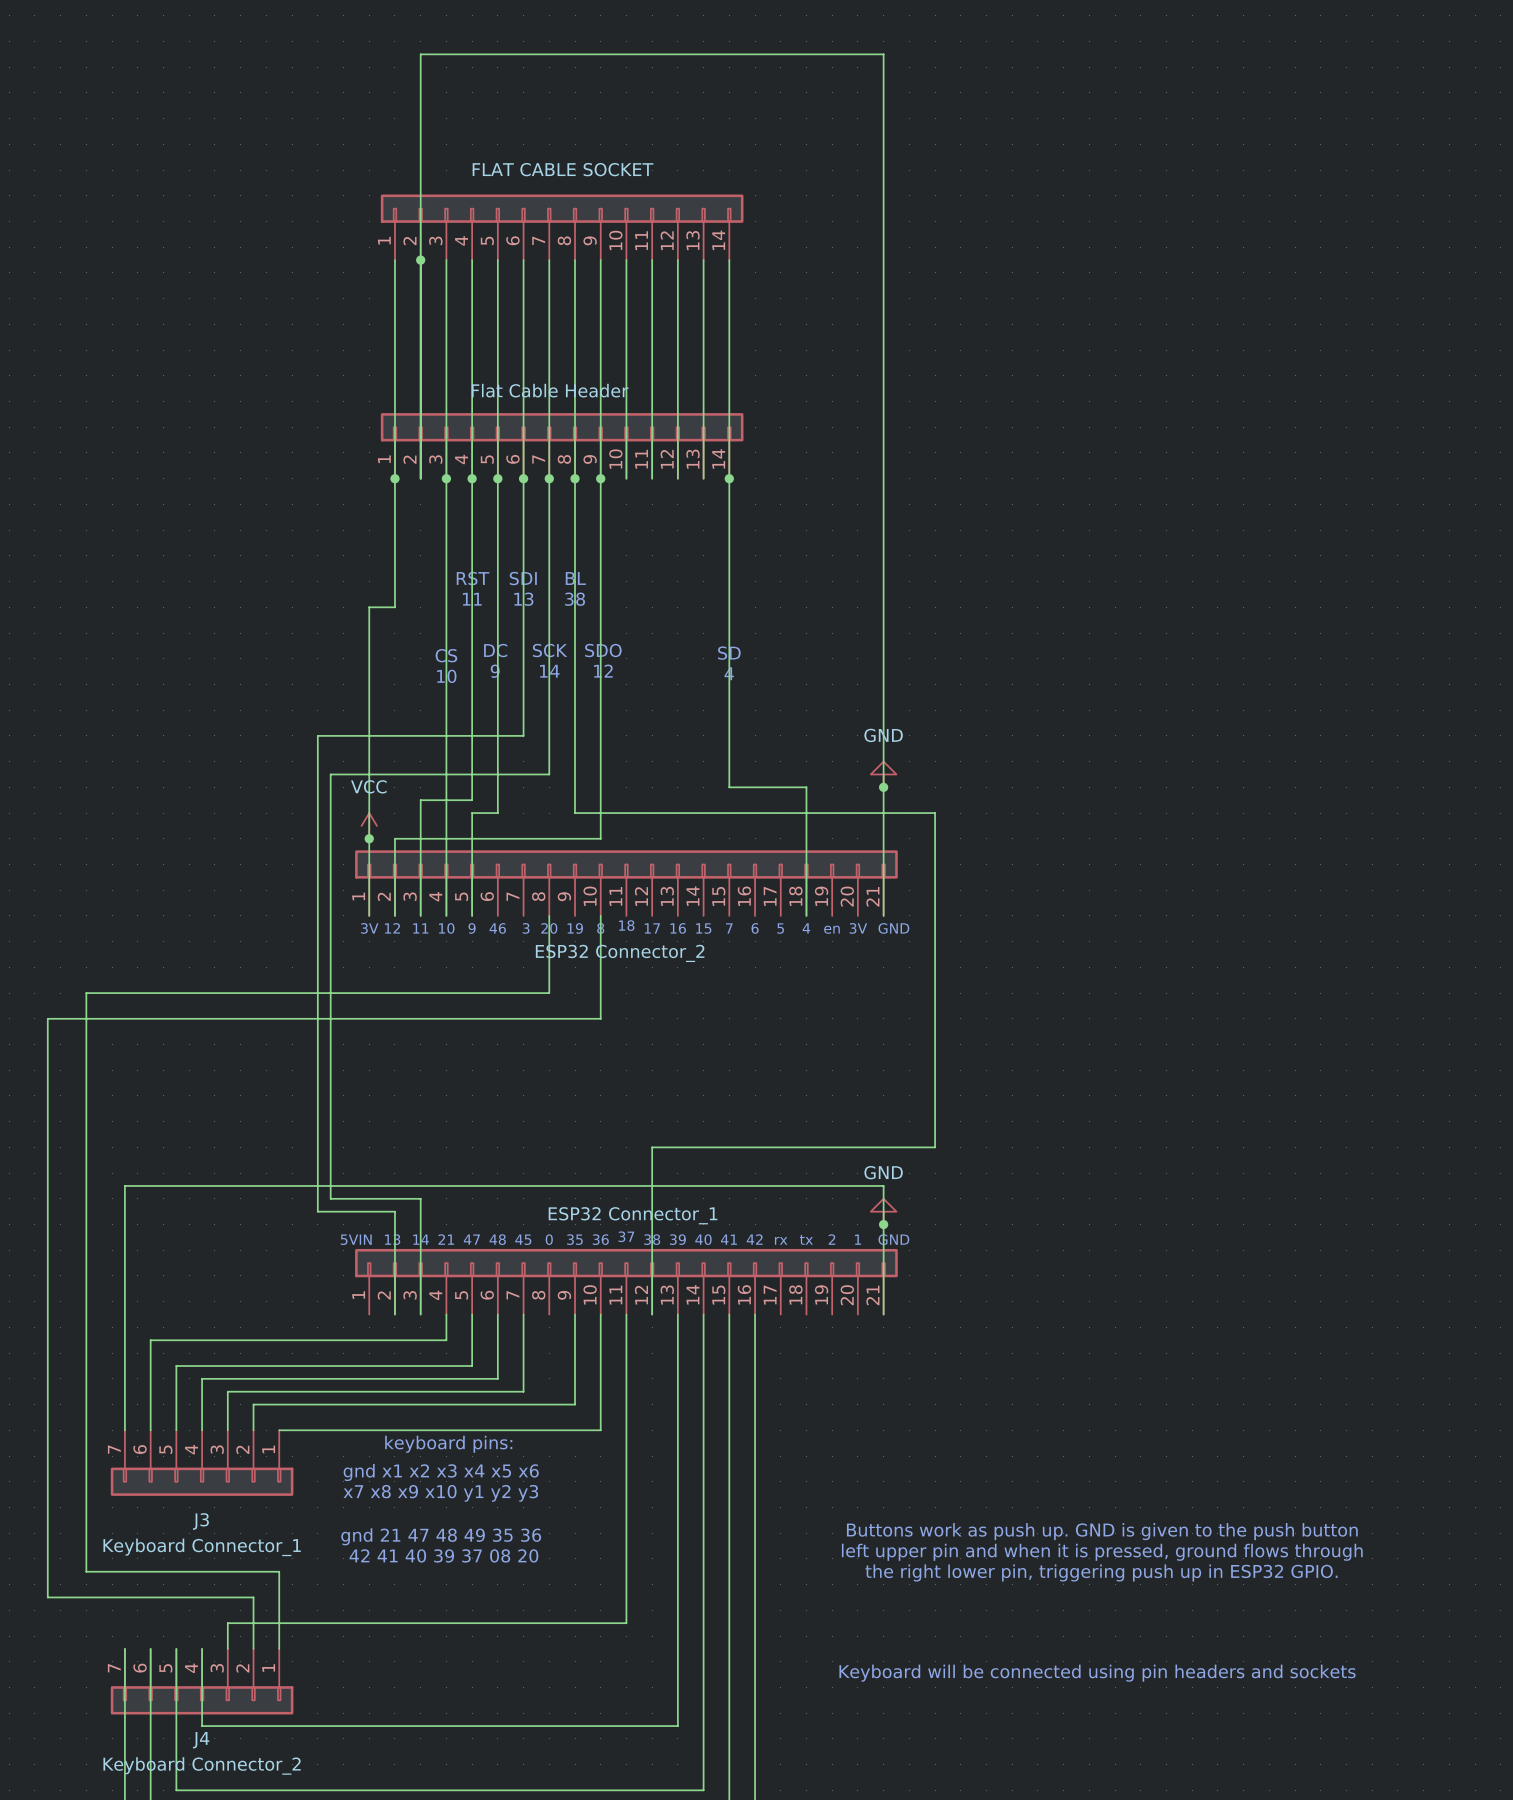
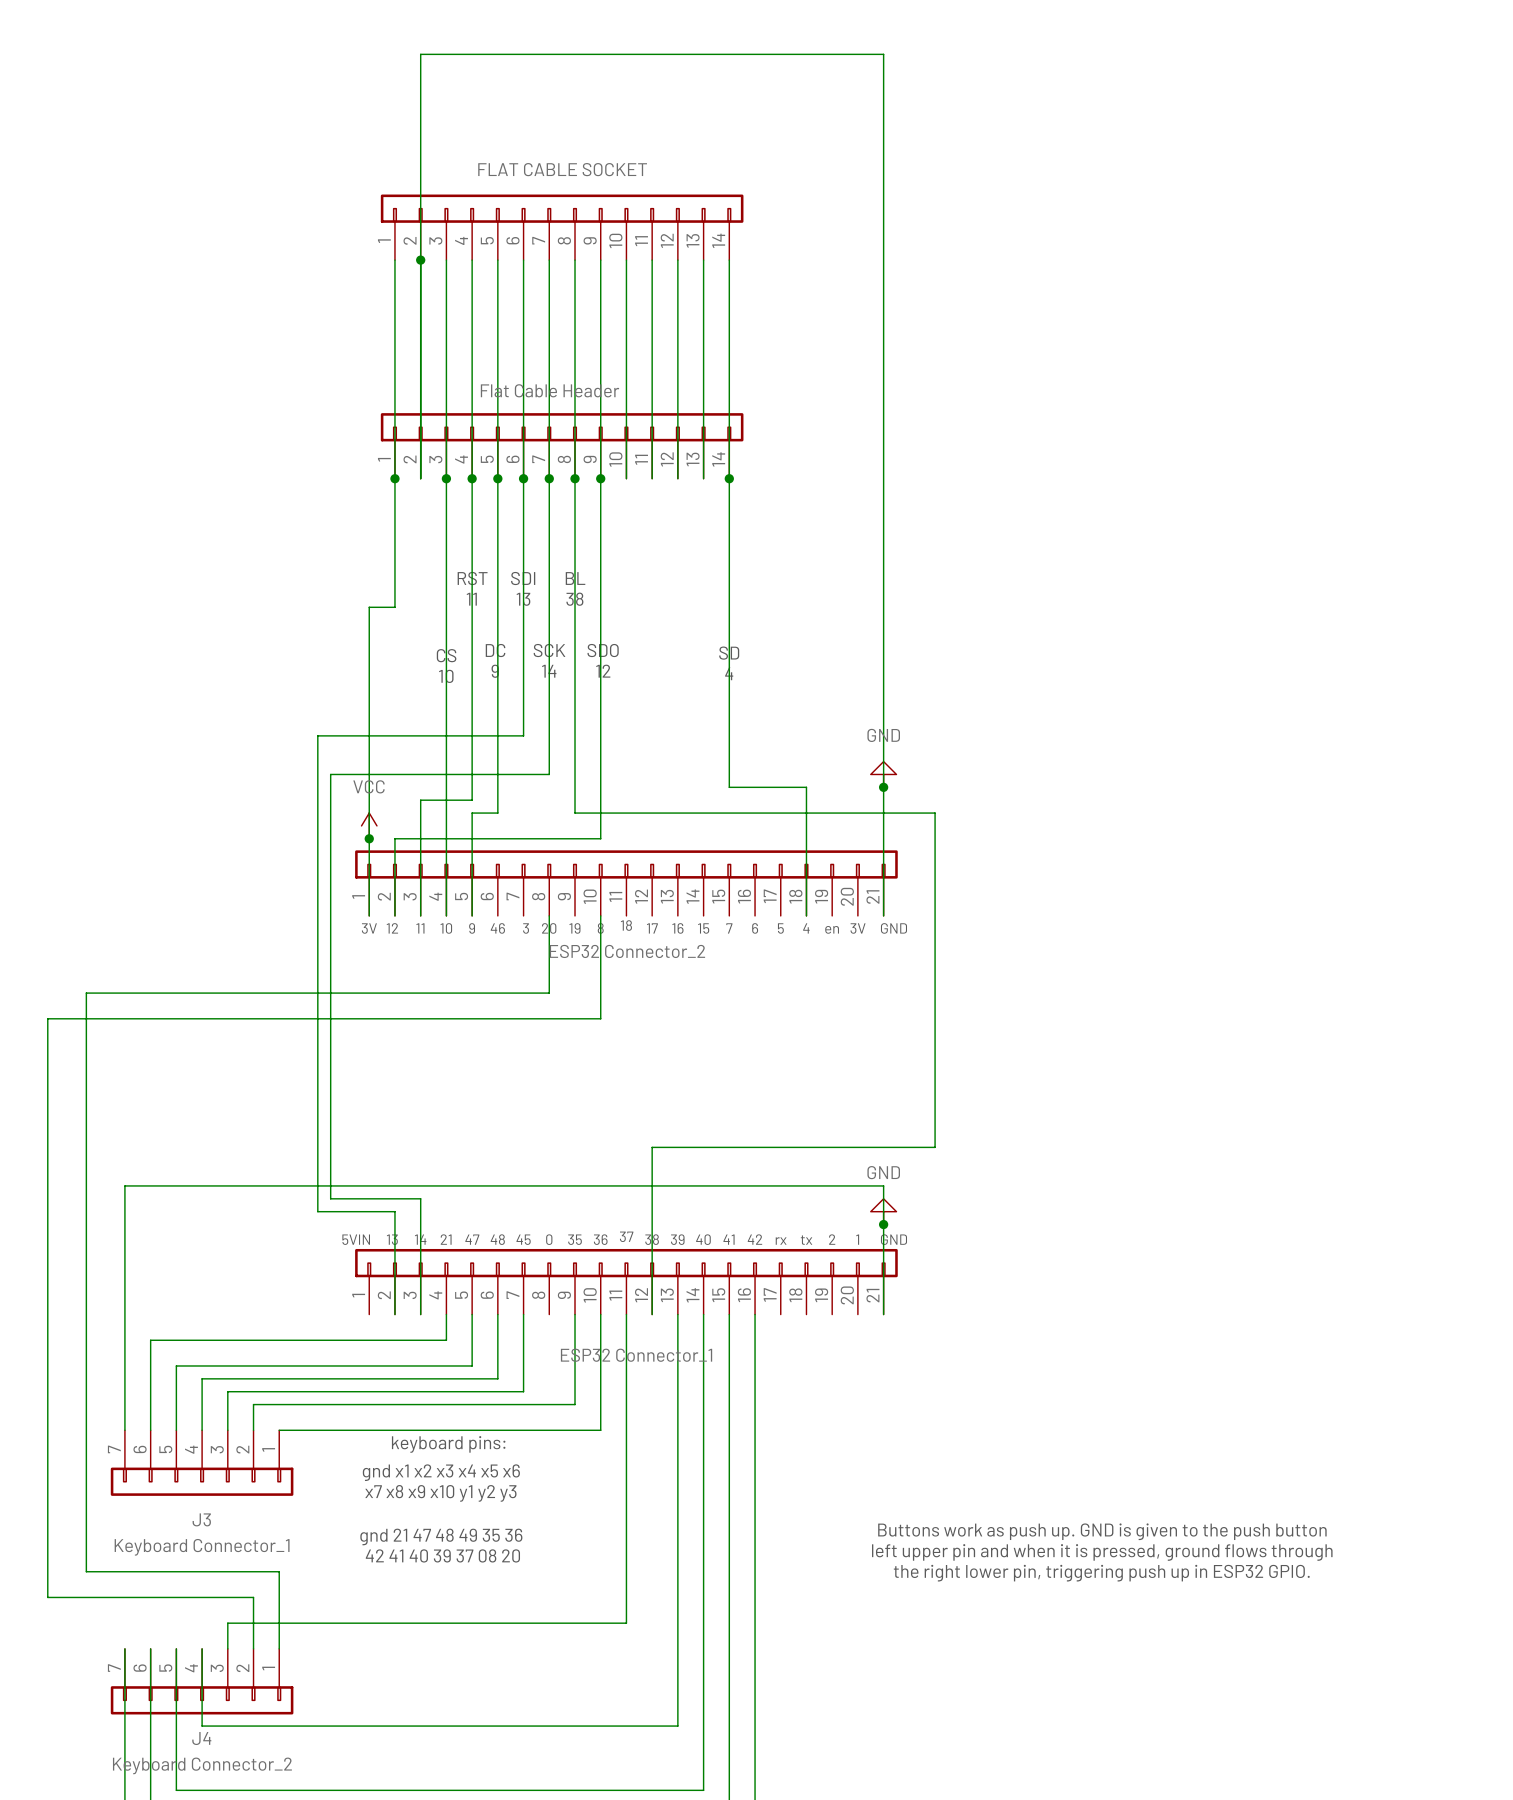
part value position: ESP32 Connector_1 (633, 1215) -> ESP32 Connector_1 (636, 1355)
text: Keyboard will be connected using pin headers and sockets (1097, 1673) -> none

